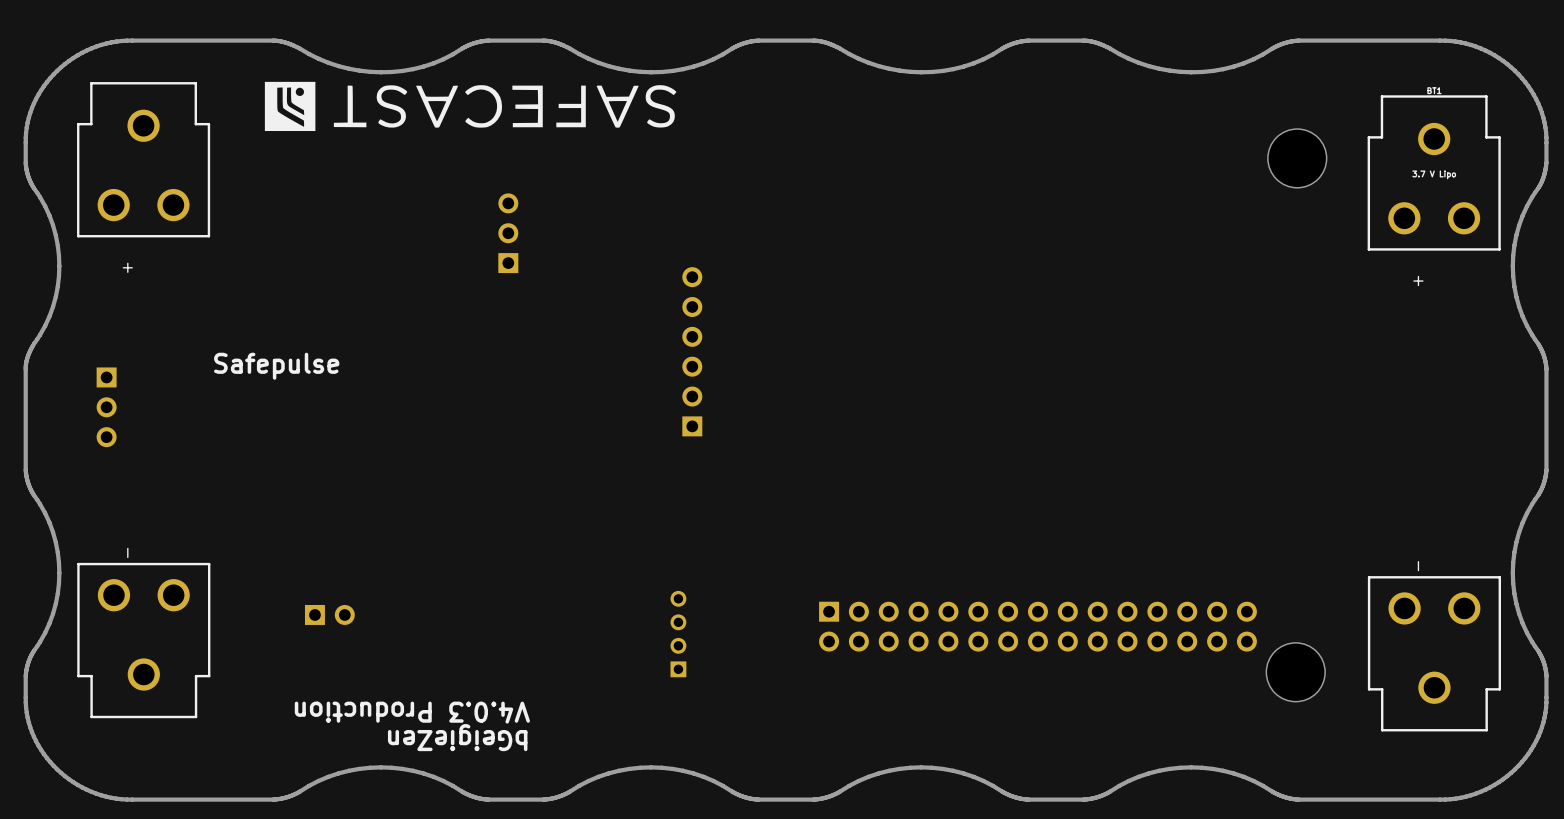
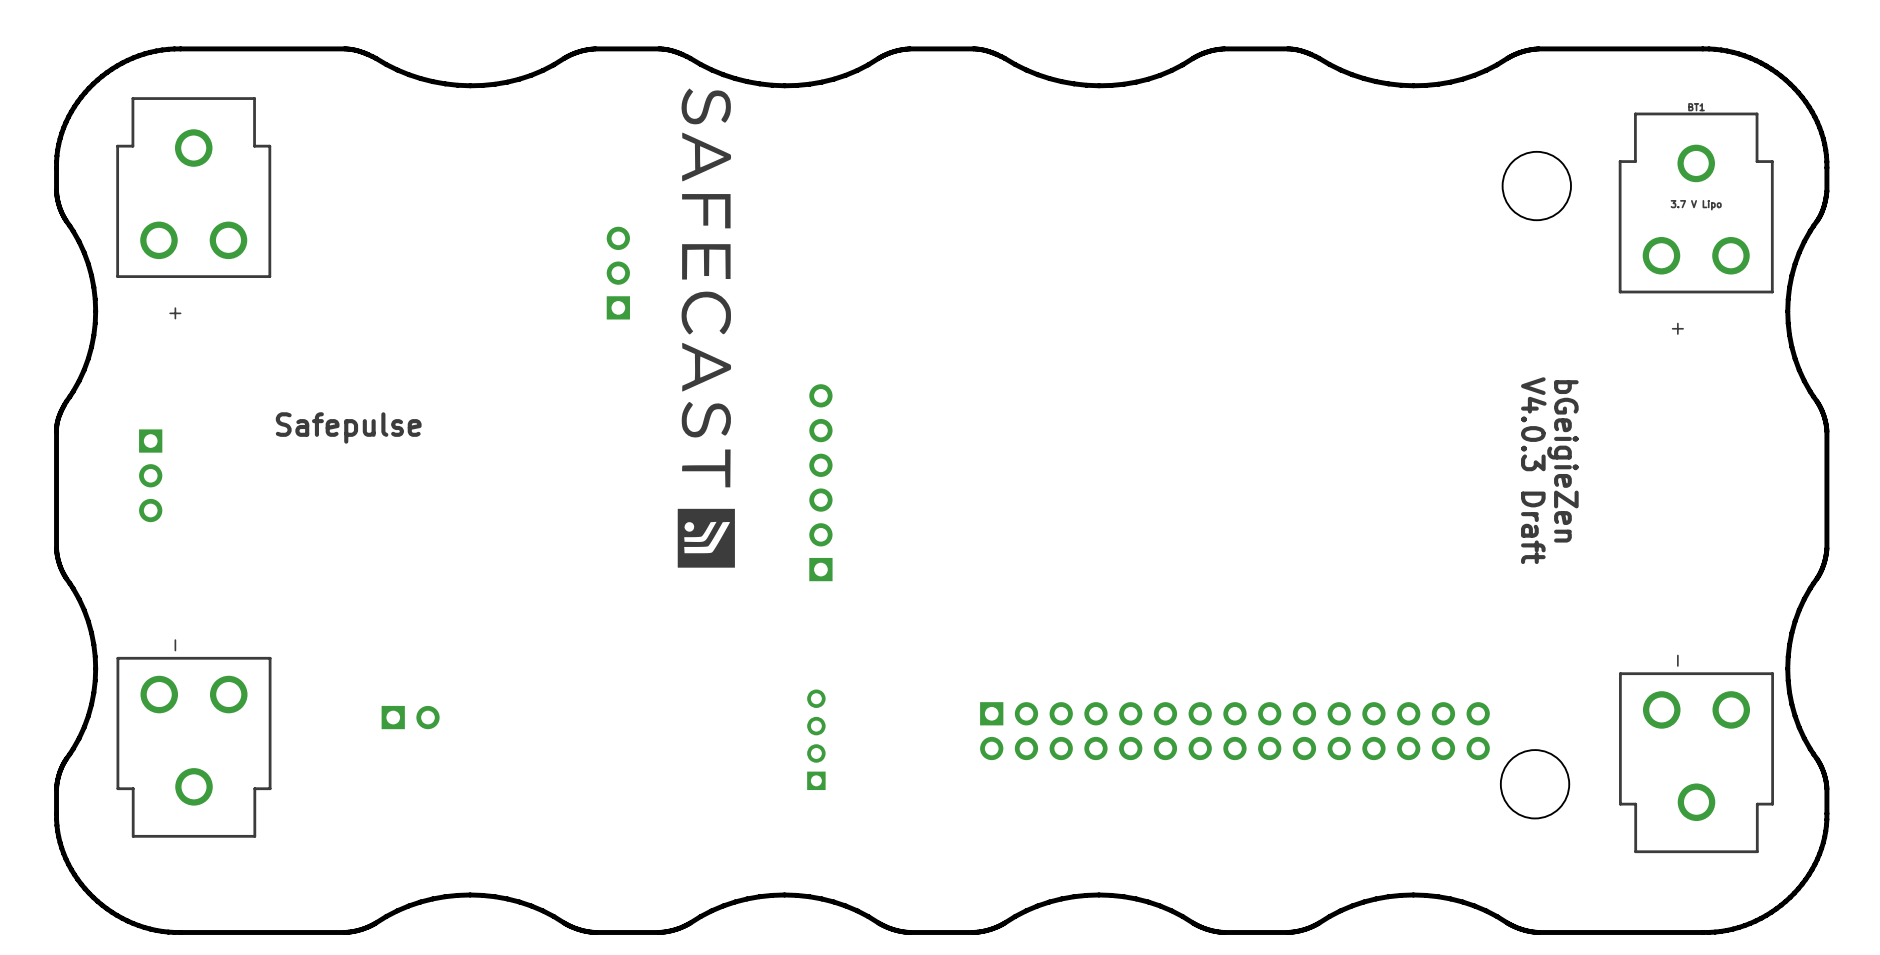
drawing: none -> [677, 88, 735, 568]
drawing: [264, 81, 677, 131] -> none
part position: (692, 351) -> (820, 482)
text: none -> bGeigieZen (1562, 461)
text: none -> V4.0.3 Draft (1533, 470)
text: V4.0.3 Production (412, 712) -> none
text: bGeigieZen (457, 737) -> none

